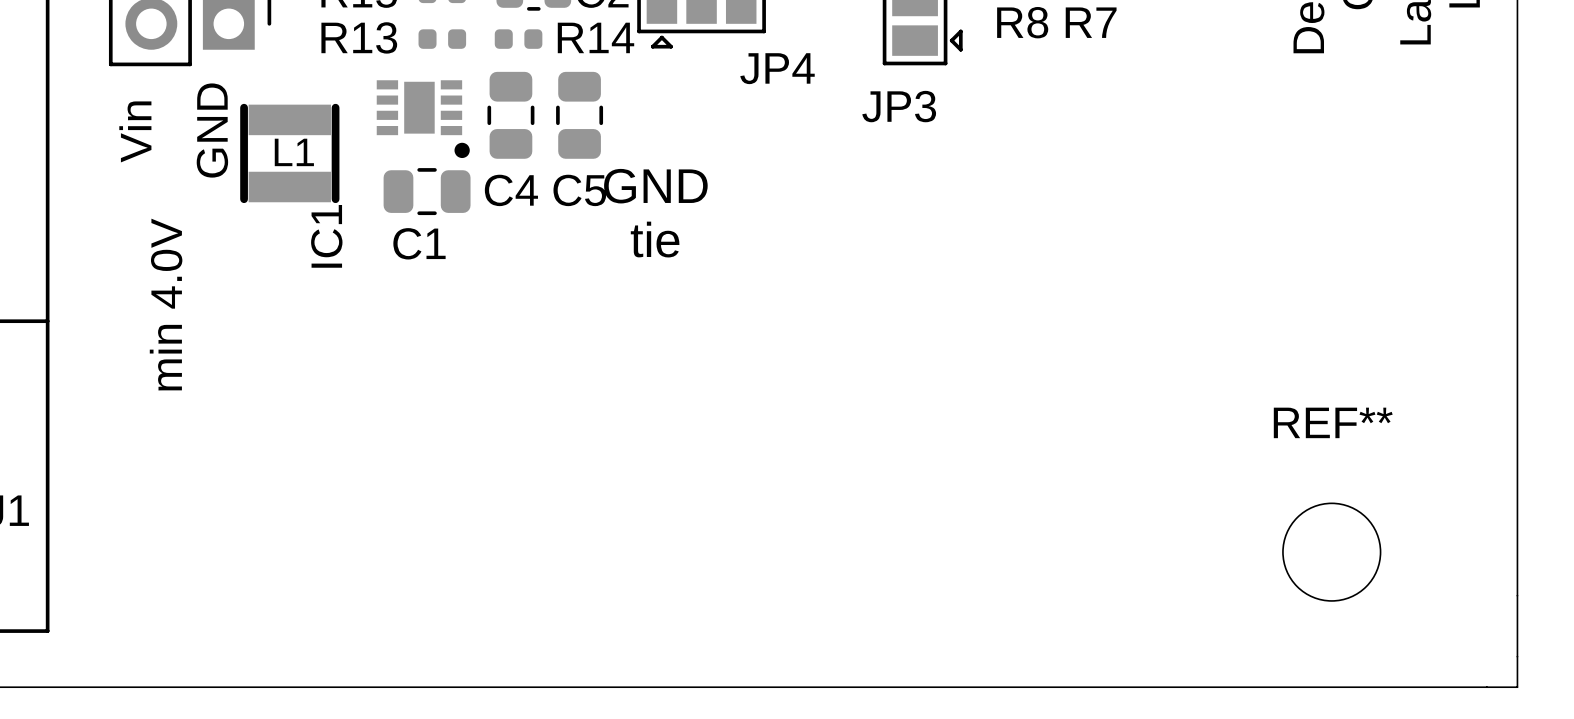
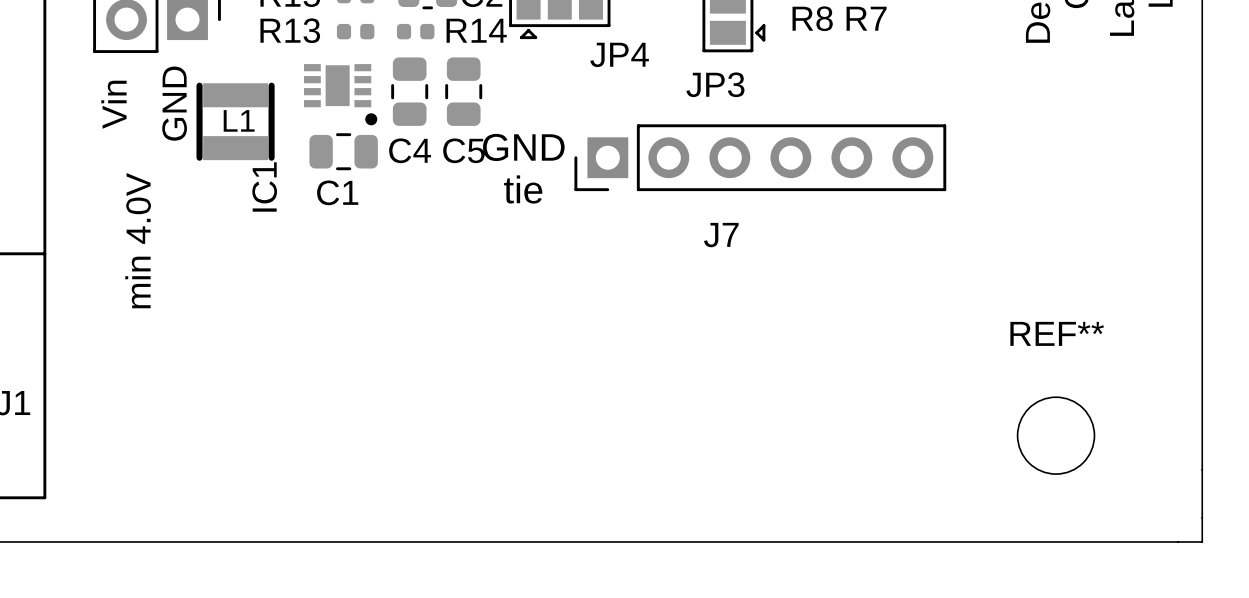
J7: none -> (760, 157)

